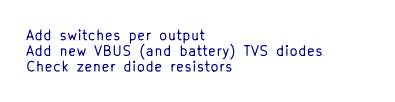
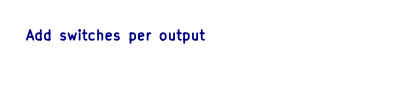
text: Add new VBUS (and battery) TVS diodes (173, 51) -> none
text: Check zener diode resistors (129, 66) -> none

